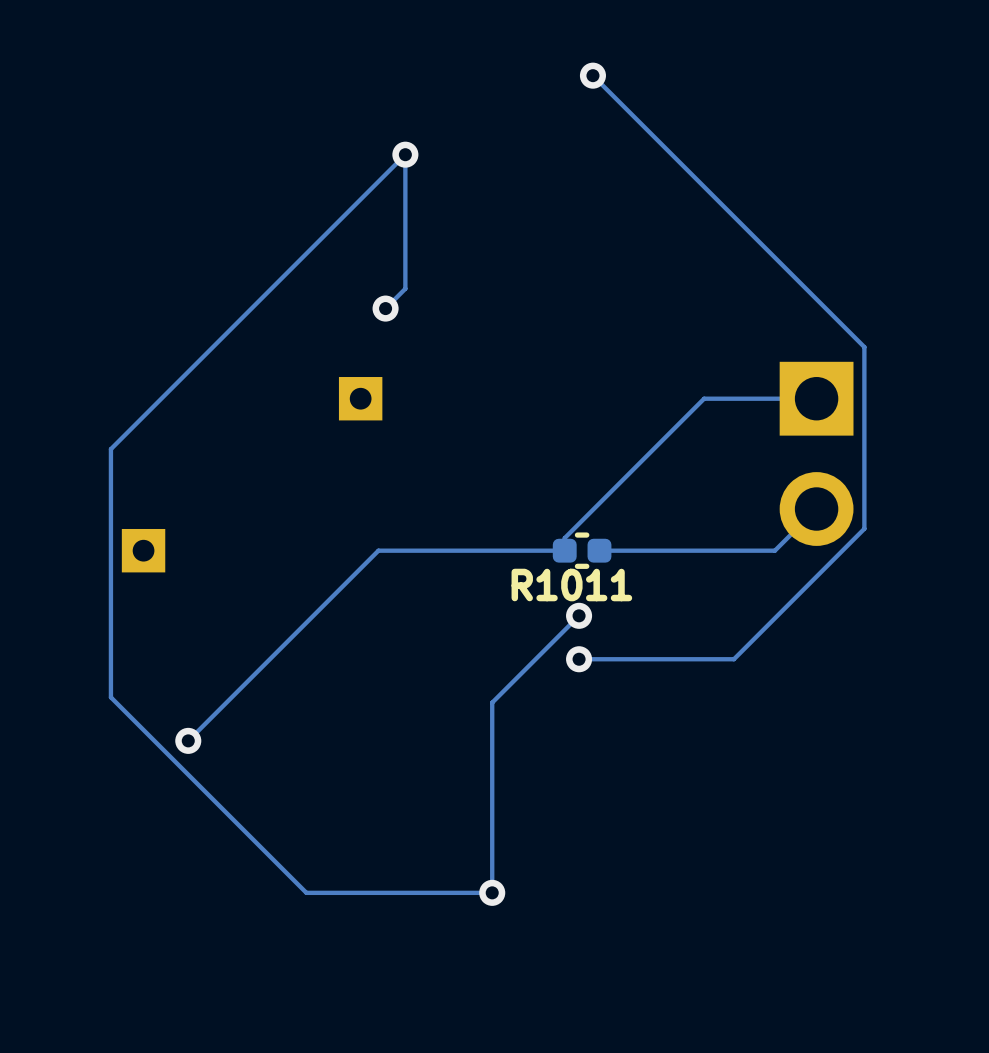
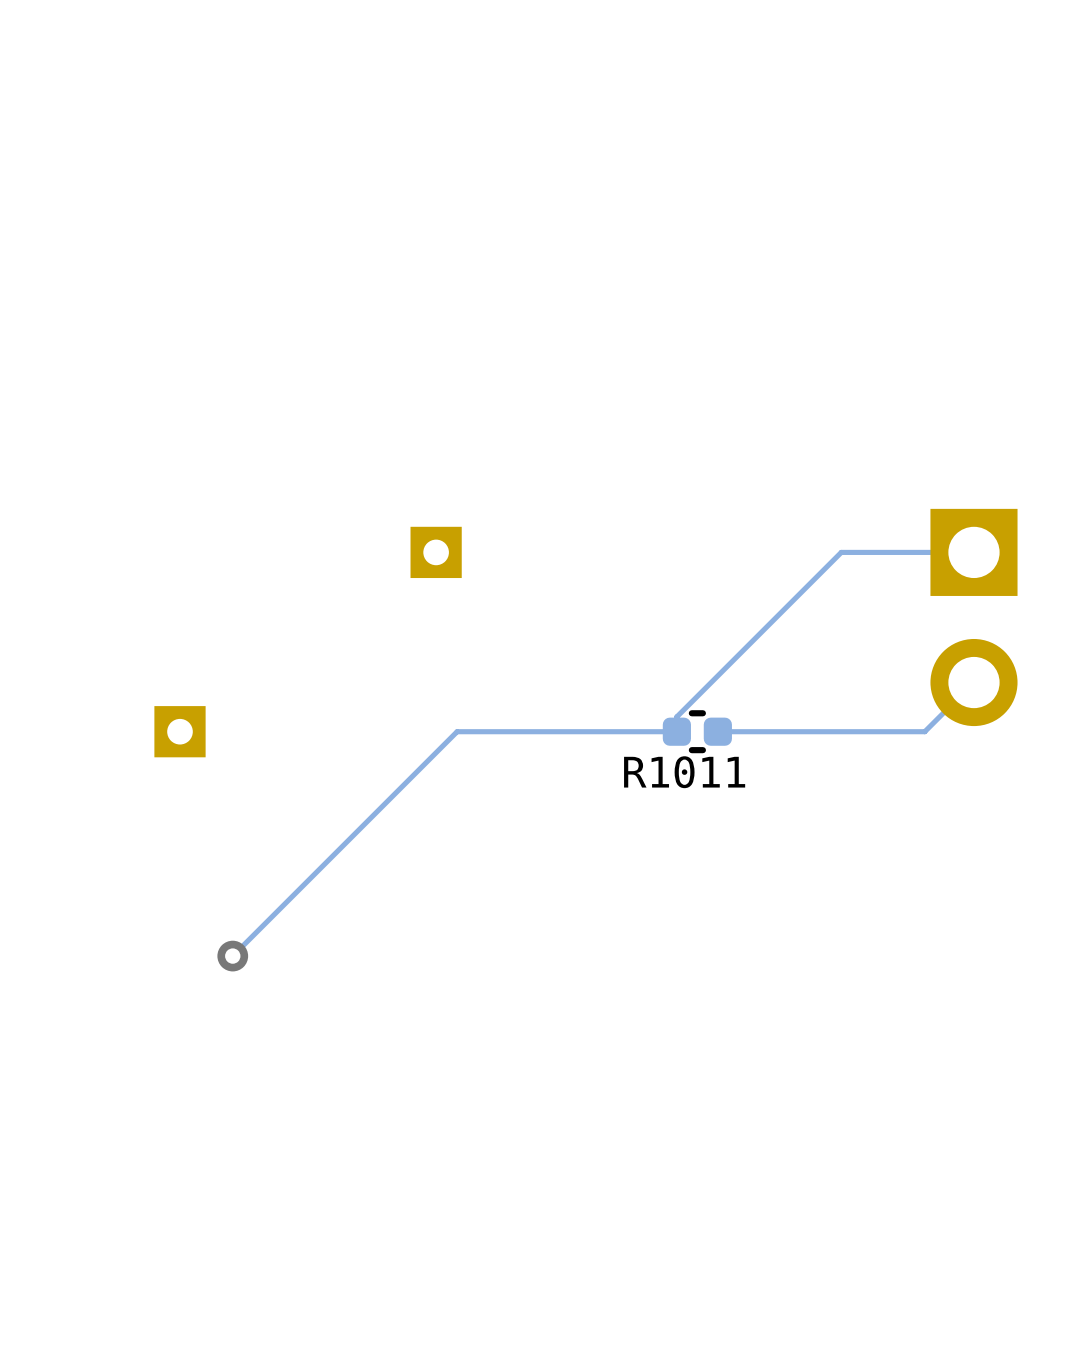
track: (592, 75) (864, 347) (864, 528) (733, 659) (579, 659) -> none
via: (592, 75) -> none
via: (405, 154) -> none
track: (385, 308) (405, 288) (405, 154) (110, 449) (110, 697) (306, 892) (492, 892) (492, 702) (579, 615) -> none
via: (385, 308) -> none
via: (579, 615) -> none
via: (579, 659) -> none
via: (492, 892) -> none

